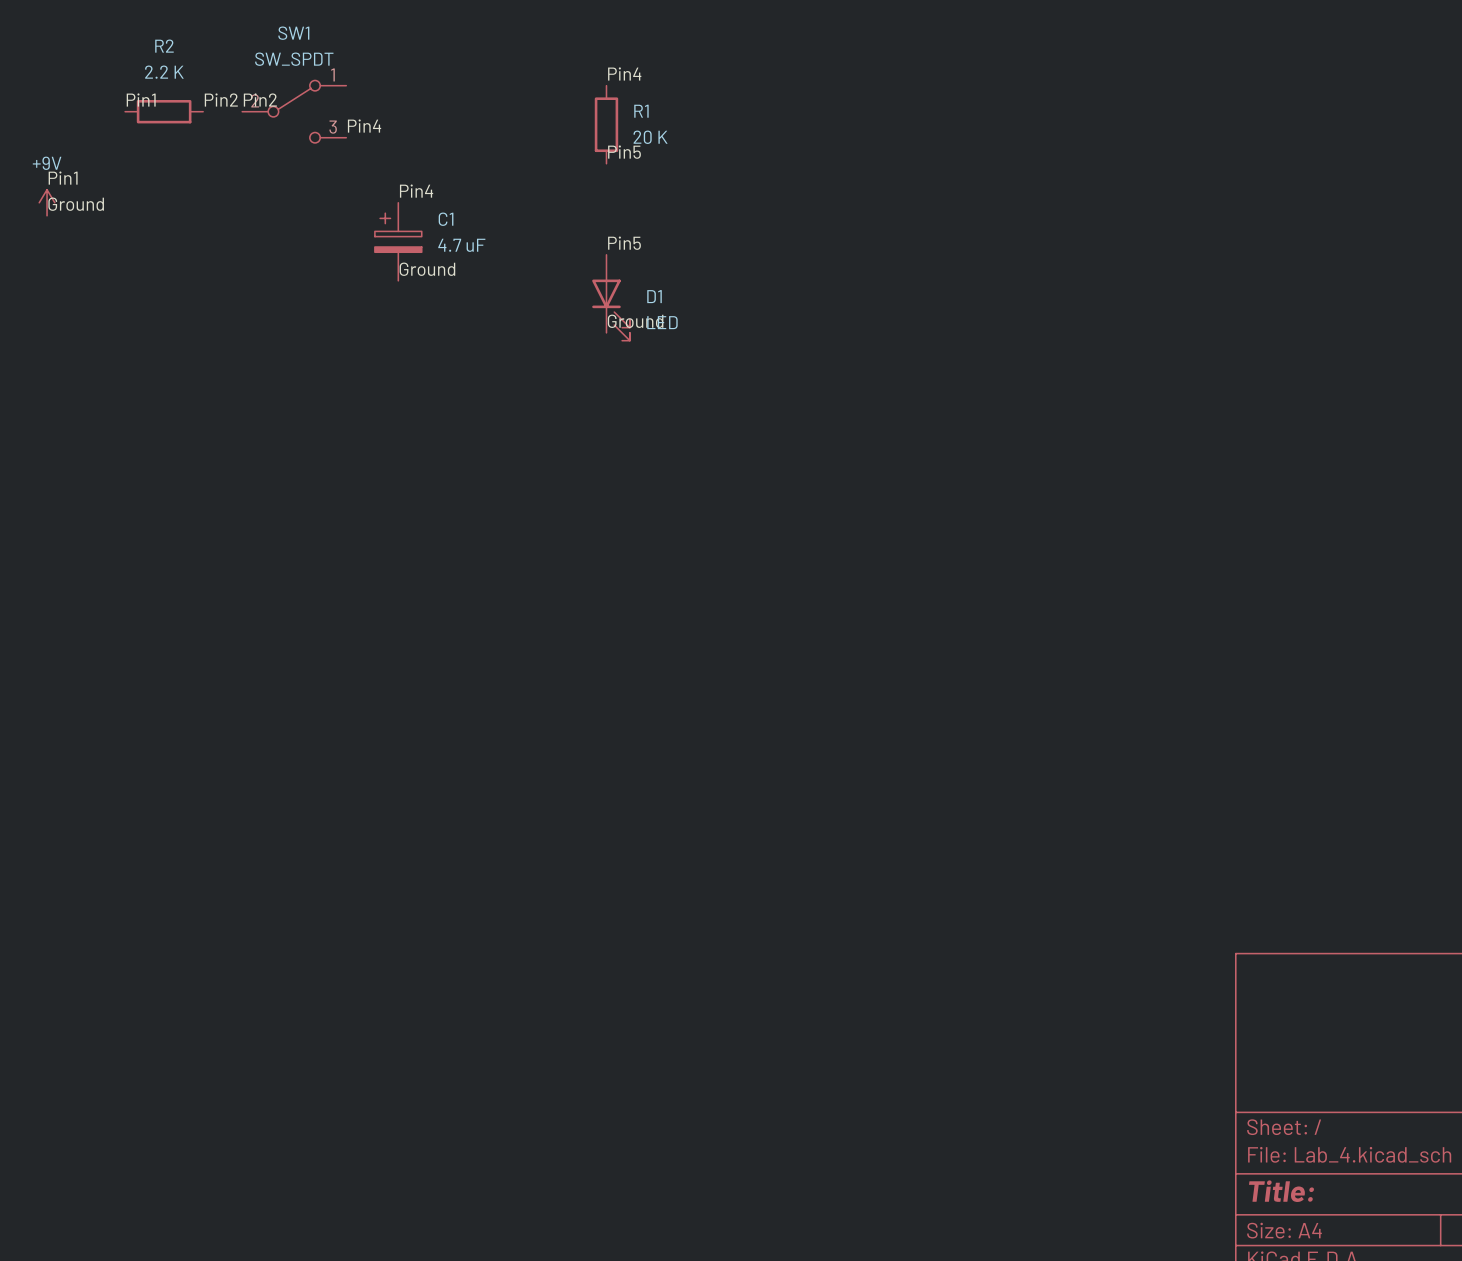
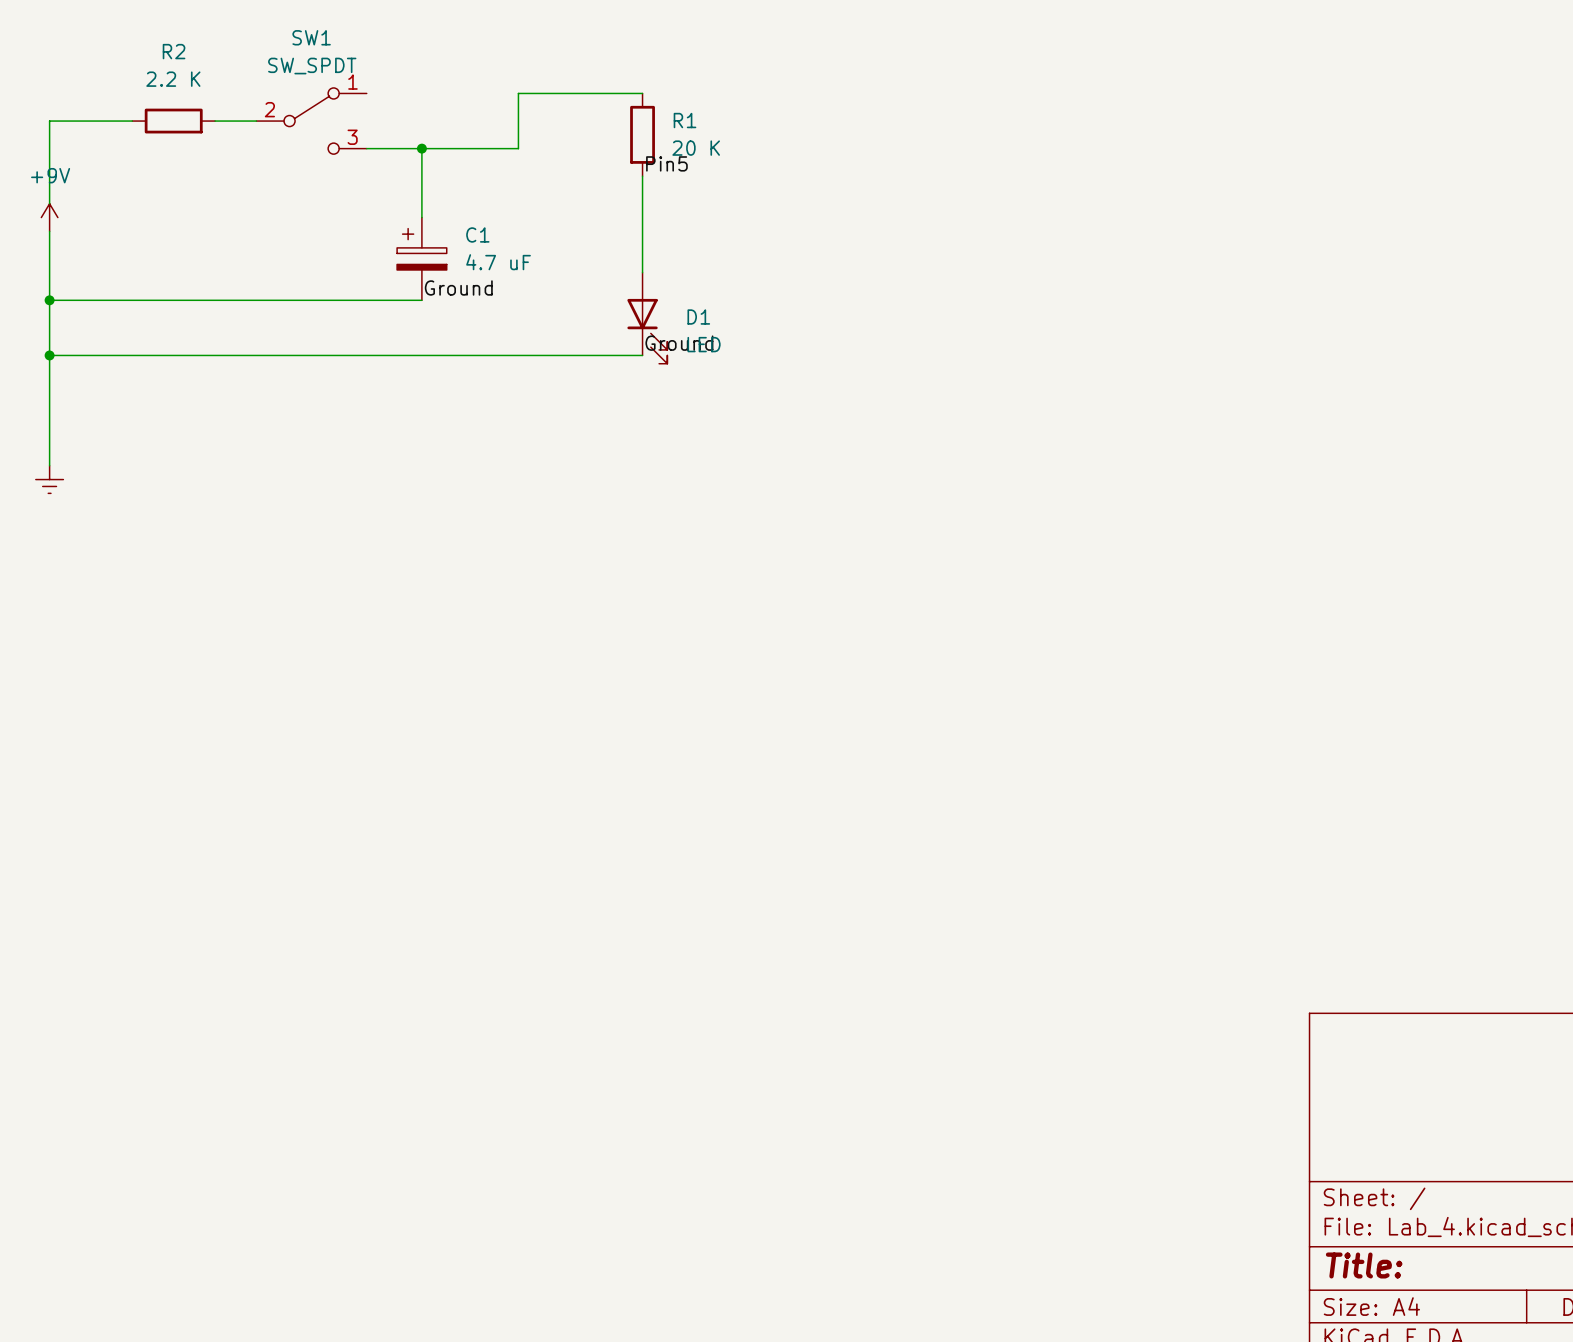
label: Pin4 (624, 73) -> none
wire: none -> (642, 93) (518, 93) (518, 148) (366, 148)
label: Pin1 (141, 100) -> none
label: Pin2 (221, 100) -> none
label: Pin2 (260, 100) -> none
wire: none -> (132, 121) (49, 121) (49, 203)
wire: none -> (215, 121) (256, 121)
label: Pin4 (364, 126) -> none
wire: none -> (421, 148) (421, 217)
junction: none -> (421, 148)
wire: none -> (642, 176) (642, 272)
label: Pin1 (63, 178) -> none
label: Pin4 (416, 191) -> none
label: Ground (76, 204) -> none
wire: none -> (49, 231) (49, 465)
label: Pin5 (624, 243) -> none
wire: none -> (49, 300) (421, 300)
junction: none -> (49, 300)
wire: none -> (49, 355) (642, 355)
junction: none -> (49, 355)
power symbol: none -> (49, 479)

